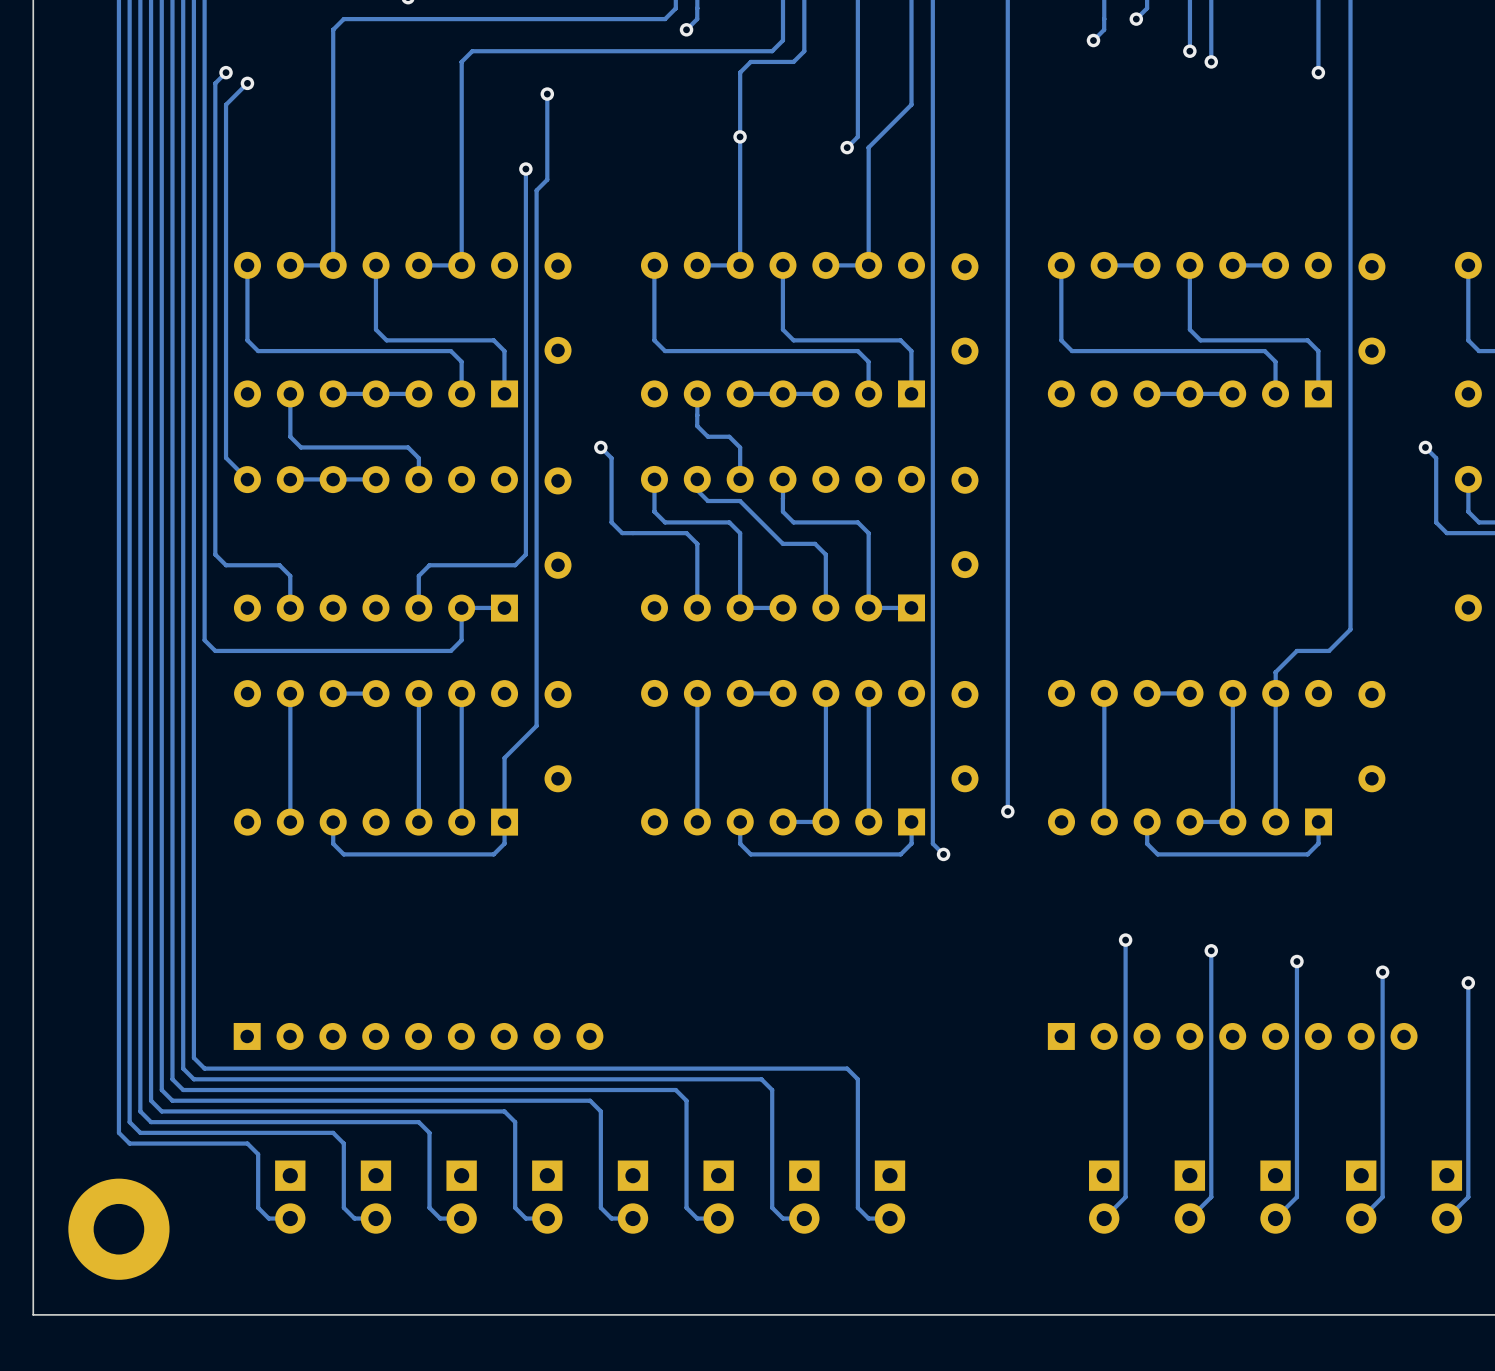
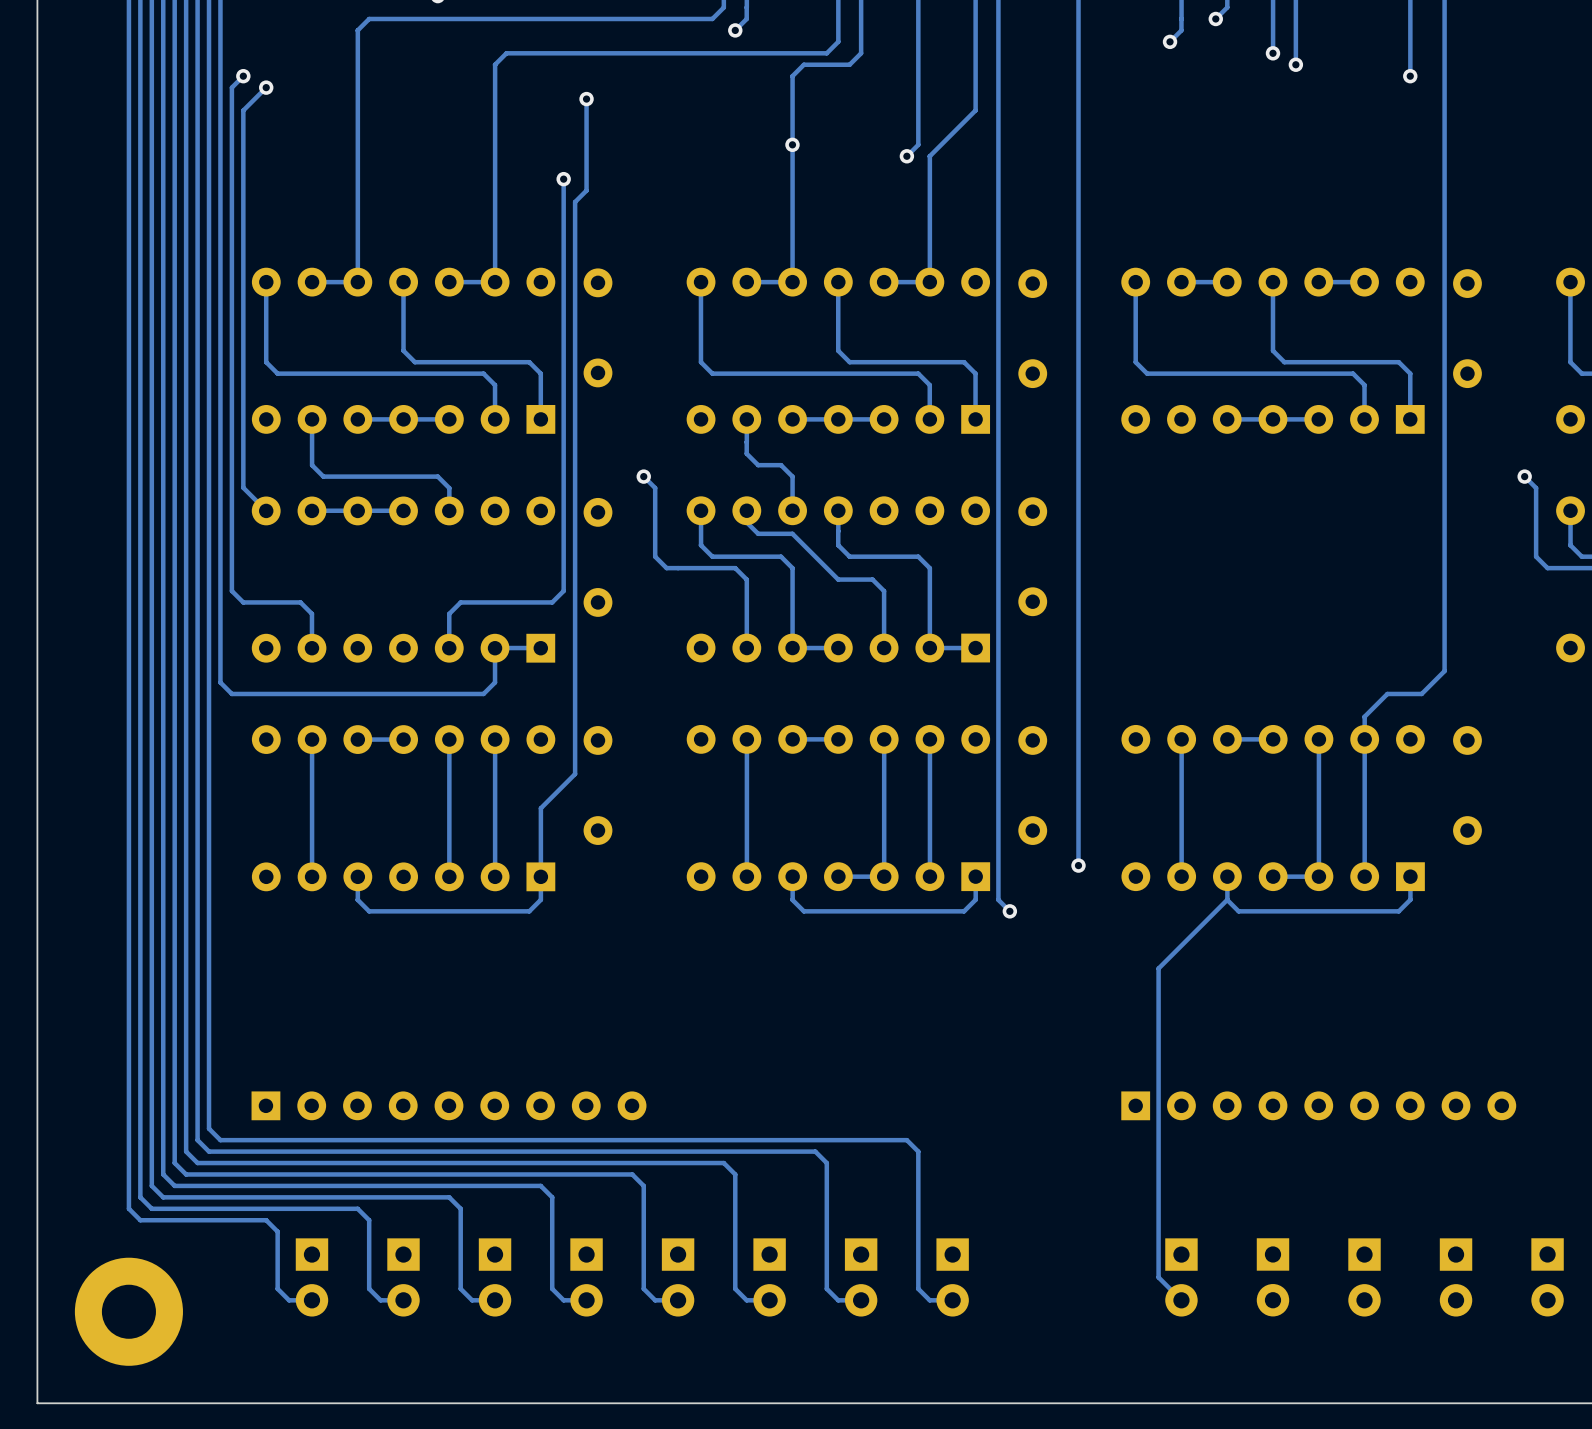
track: (1125, 940) (1125, 1197) (1104, 1218) -> (1227, 899) (1158, 968) (1158, 1277) (1181, 1300)
via: (1125, 940) -> none
track: (1211, 950) (1211, 1197) (1189, 1218) -> none
via: (1211, 950) -> none
track: (1296, 961) (1296, 1197) (1275, 1218) -> none
via: (1296, 961) -> none
track: (1382, 972) (1382, 1197) (1361, 1218) -> none
via: (1382, 972) -> none
track: (1468, 982) (1468, 1197) -> none
via: (1468, 982) -> none
track: (1468, 1197) (1446, 1218) -> none

